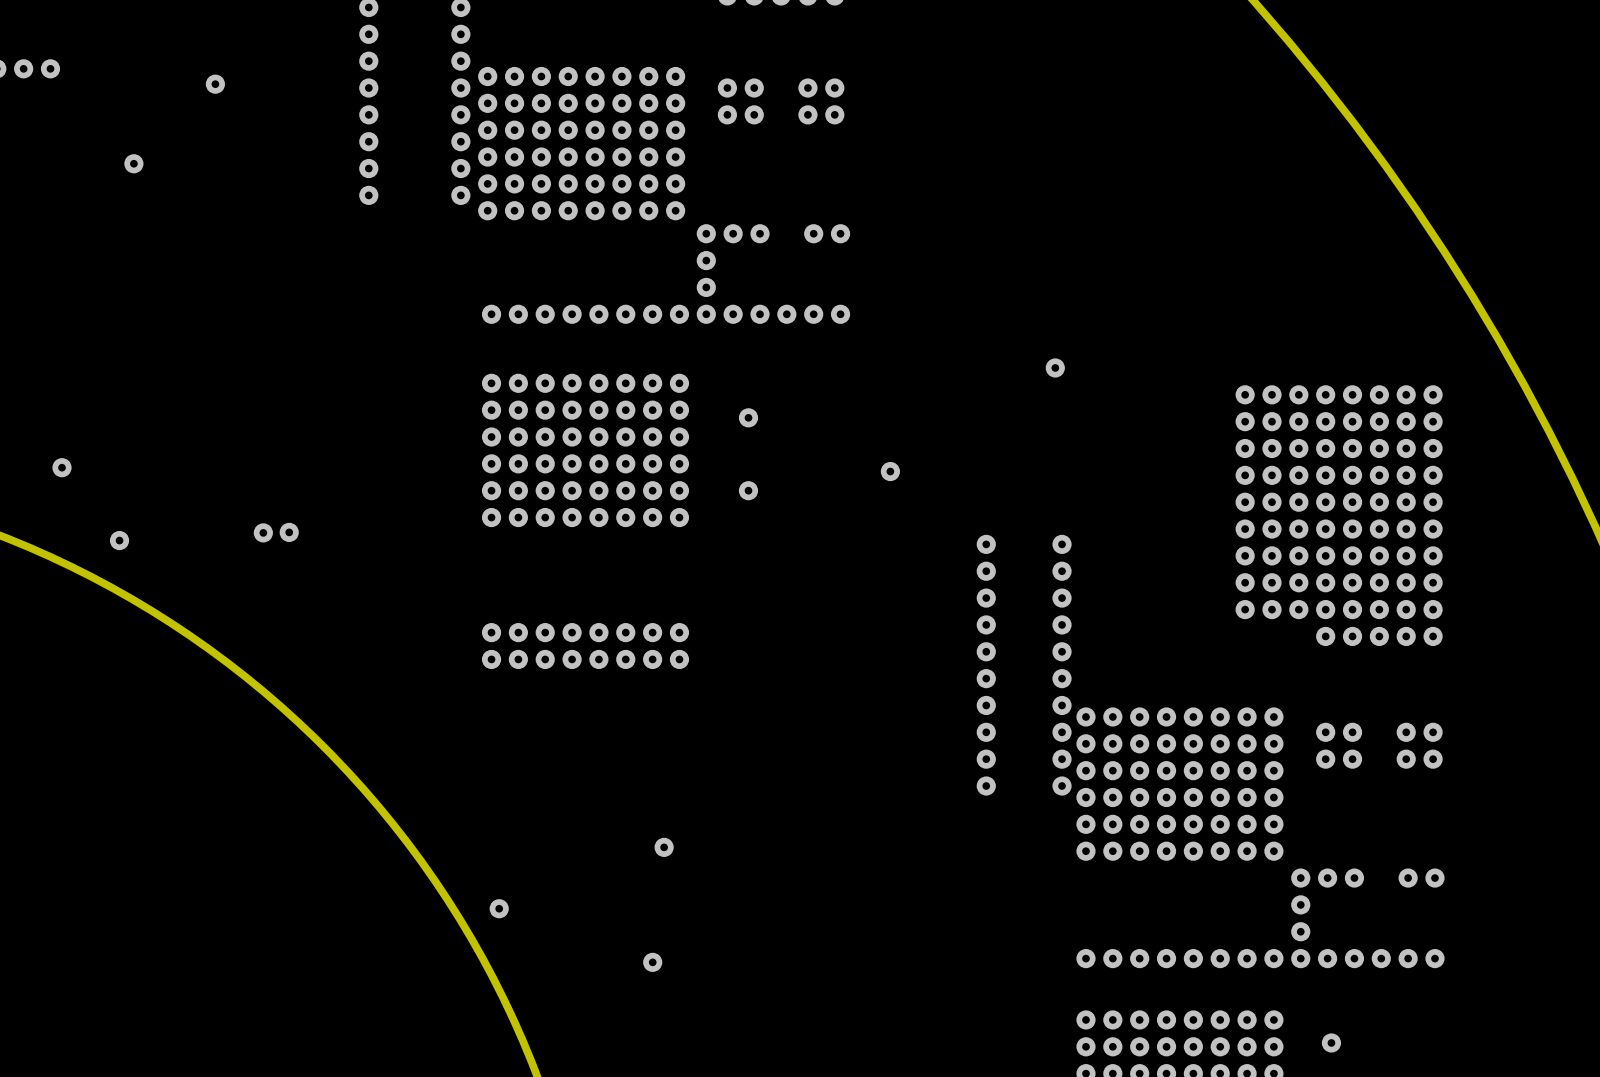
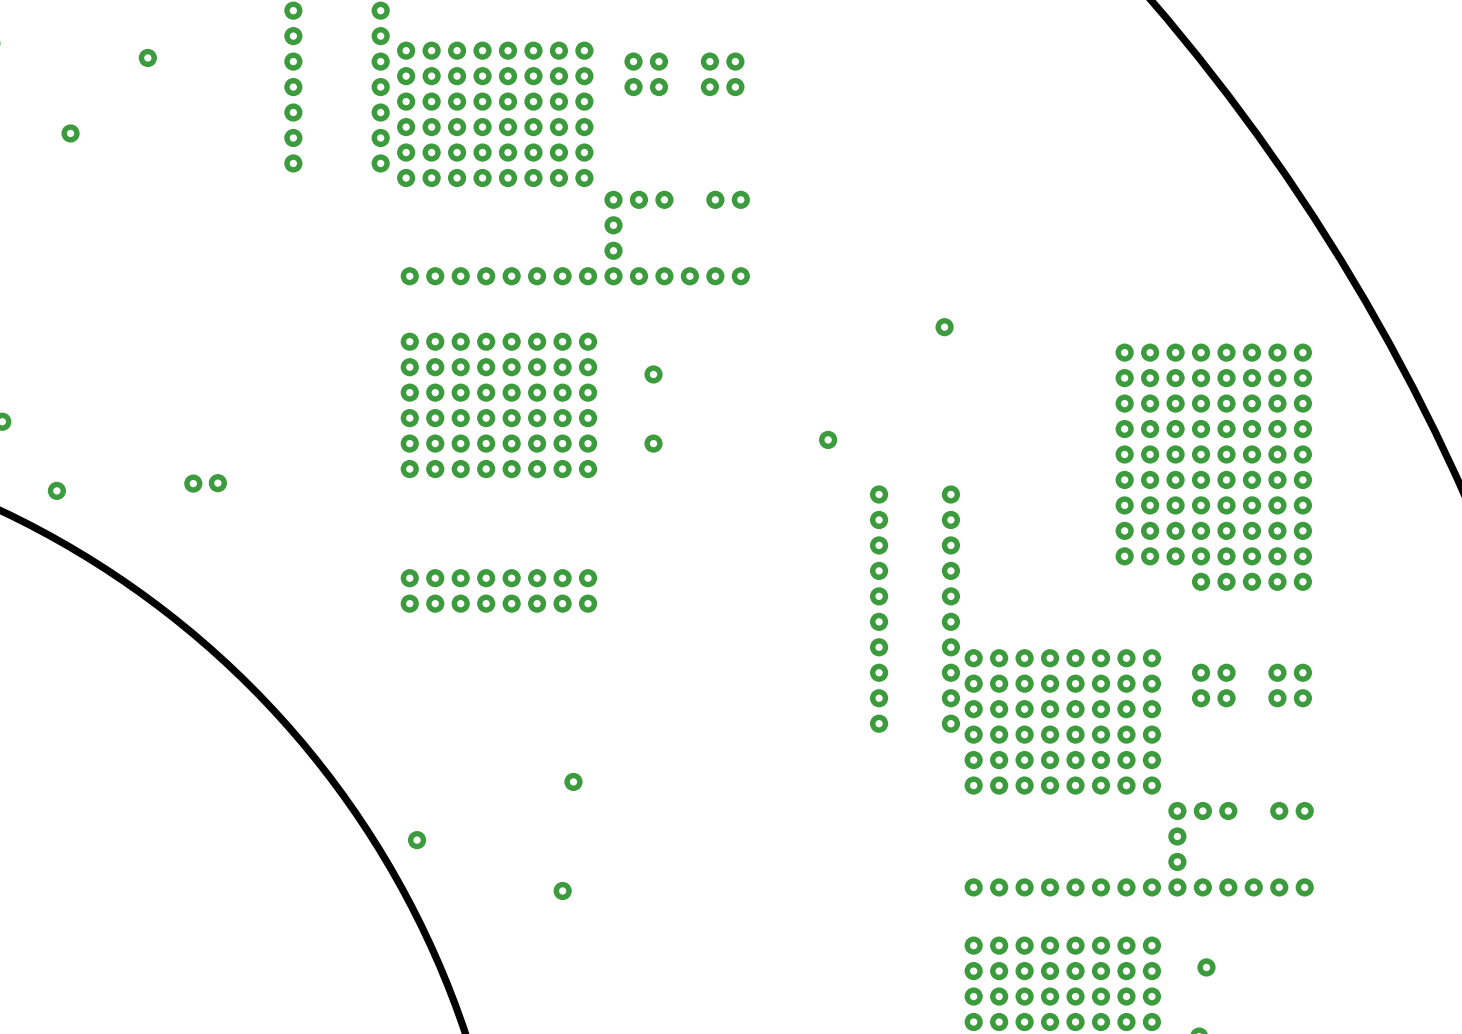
via position: (890, 471) -> (828, 439)

